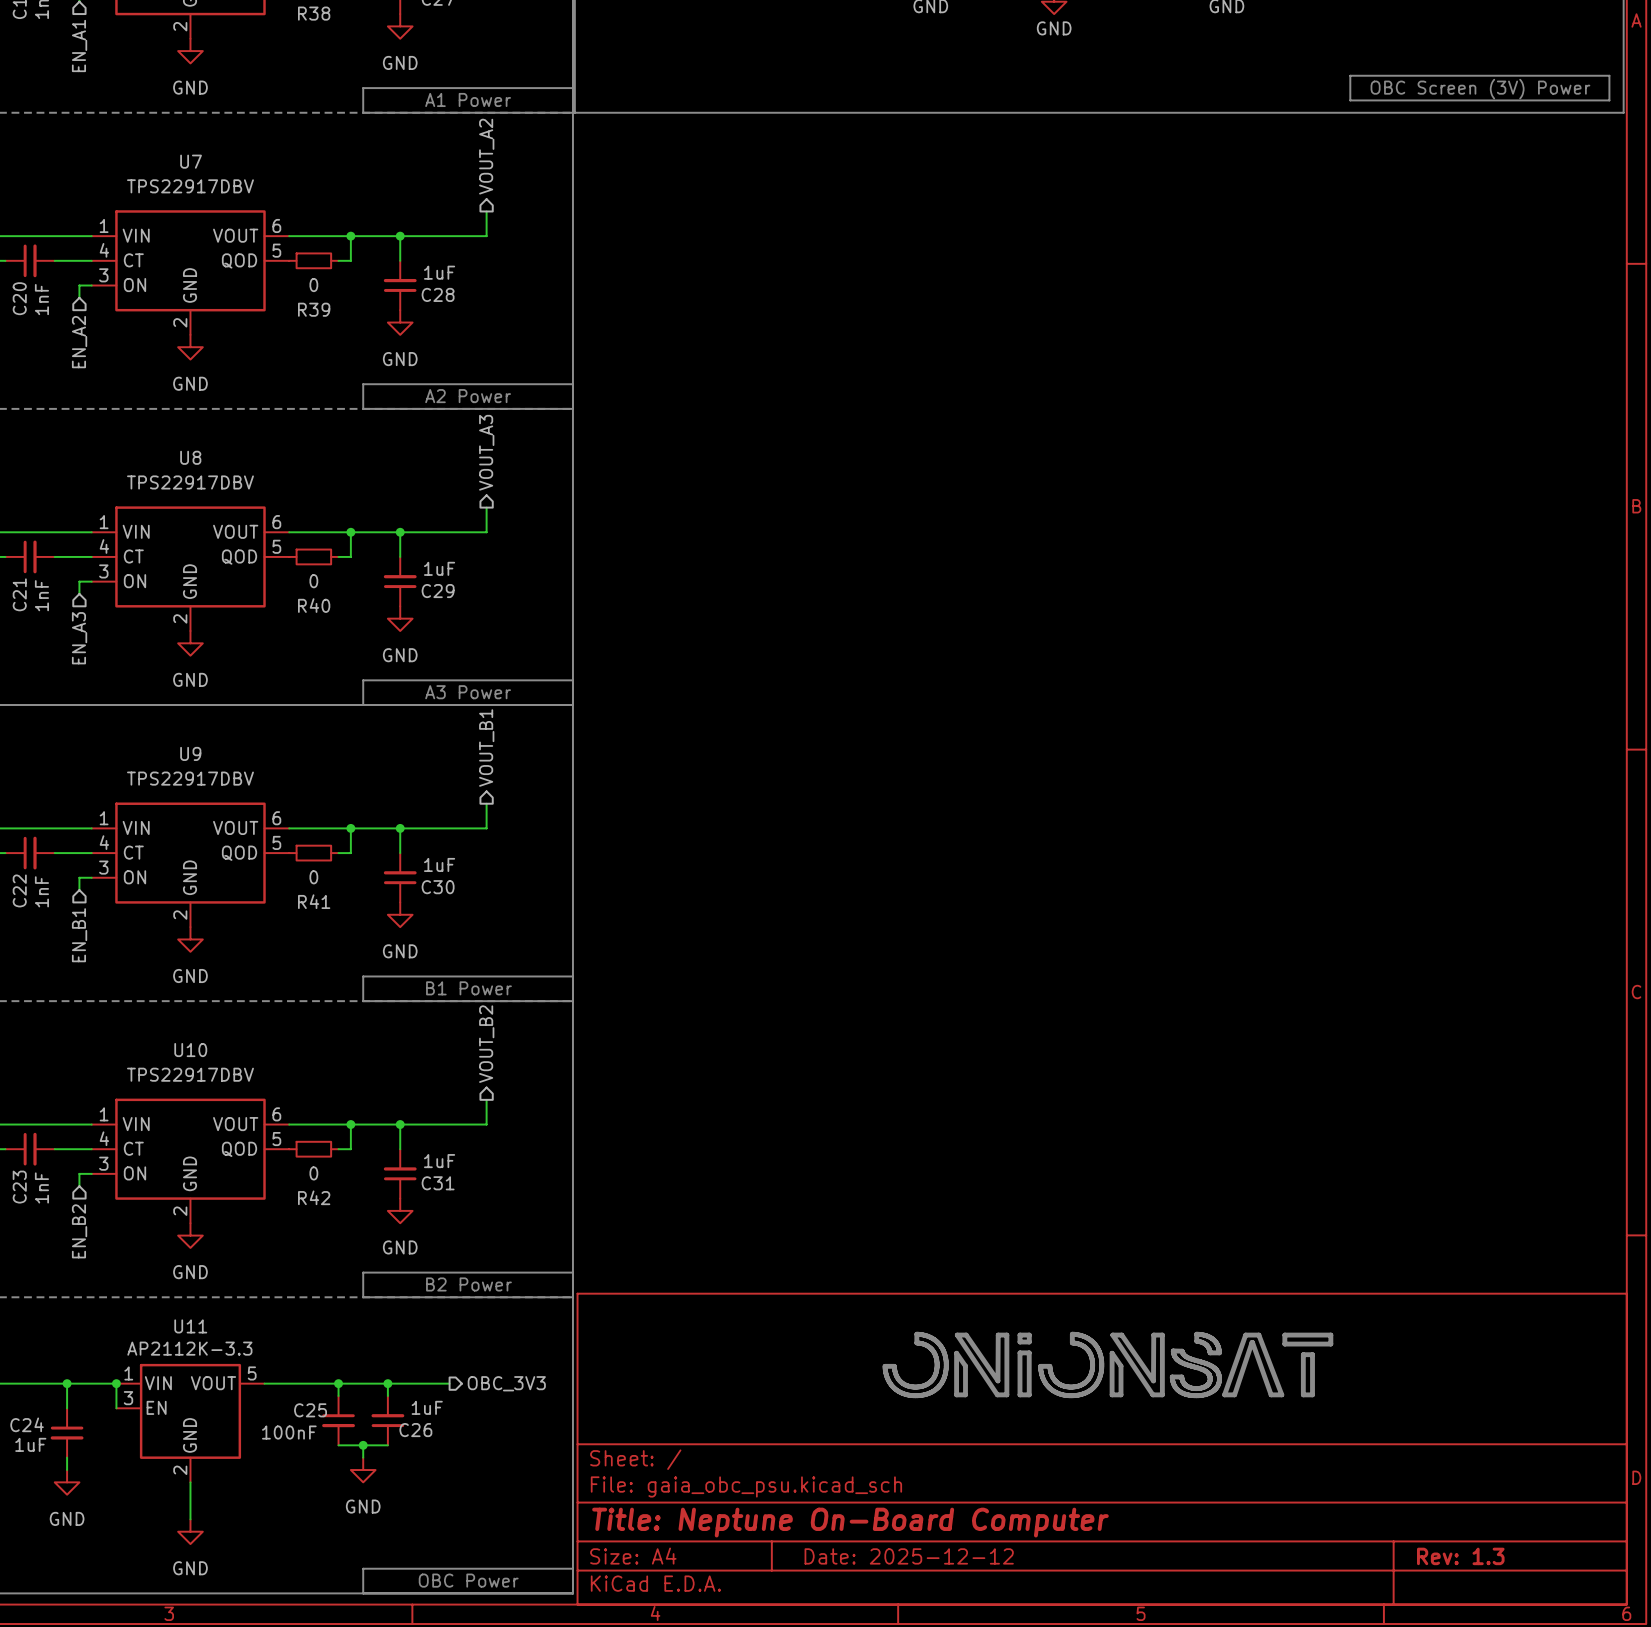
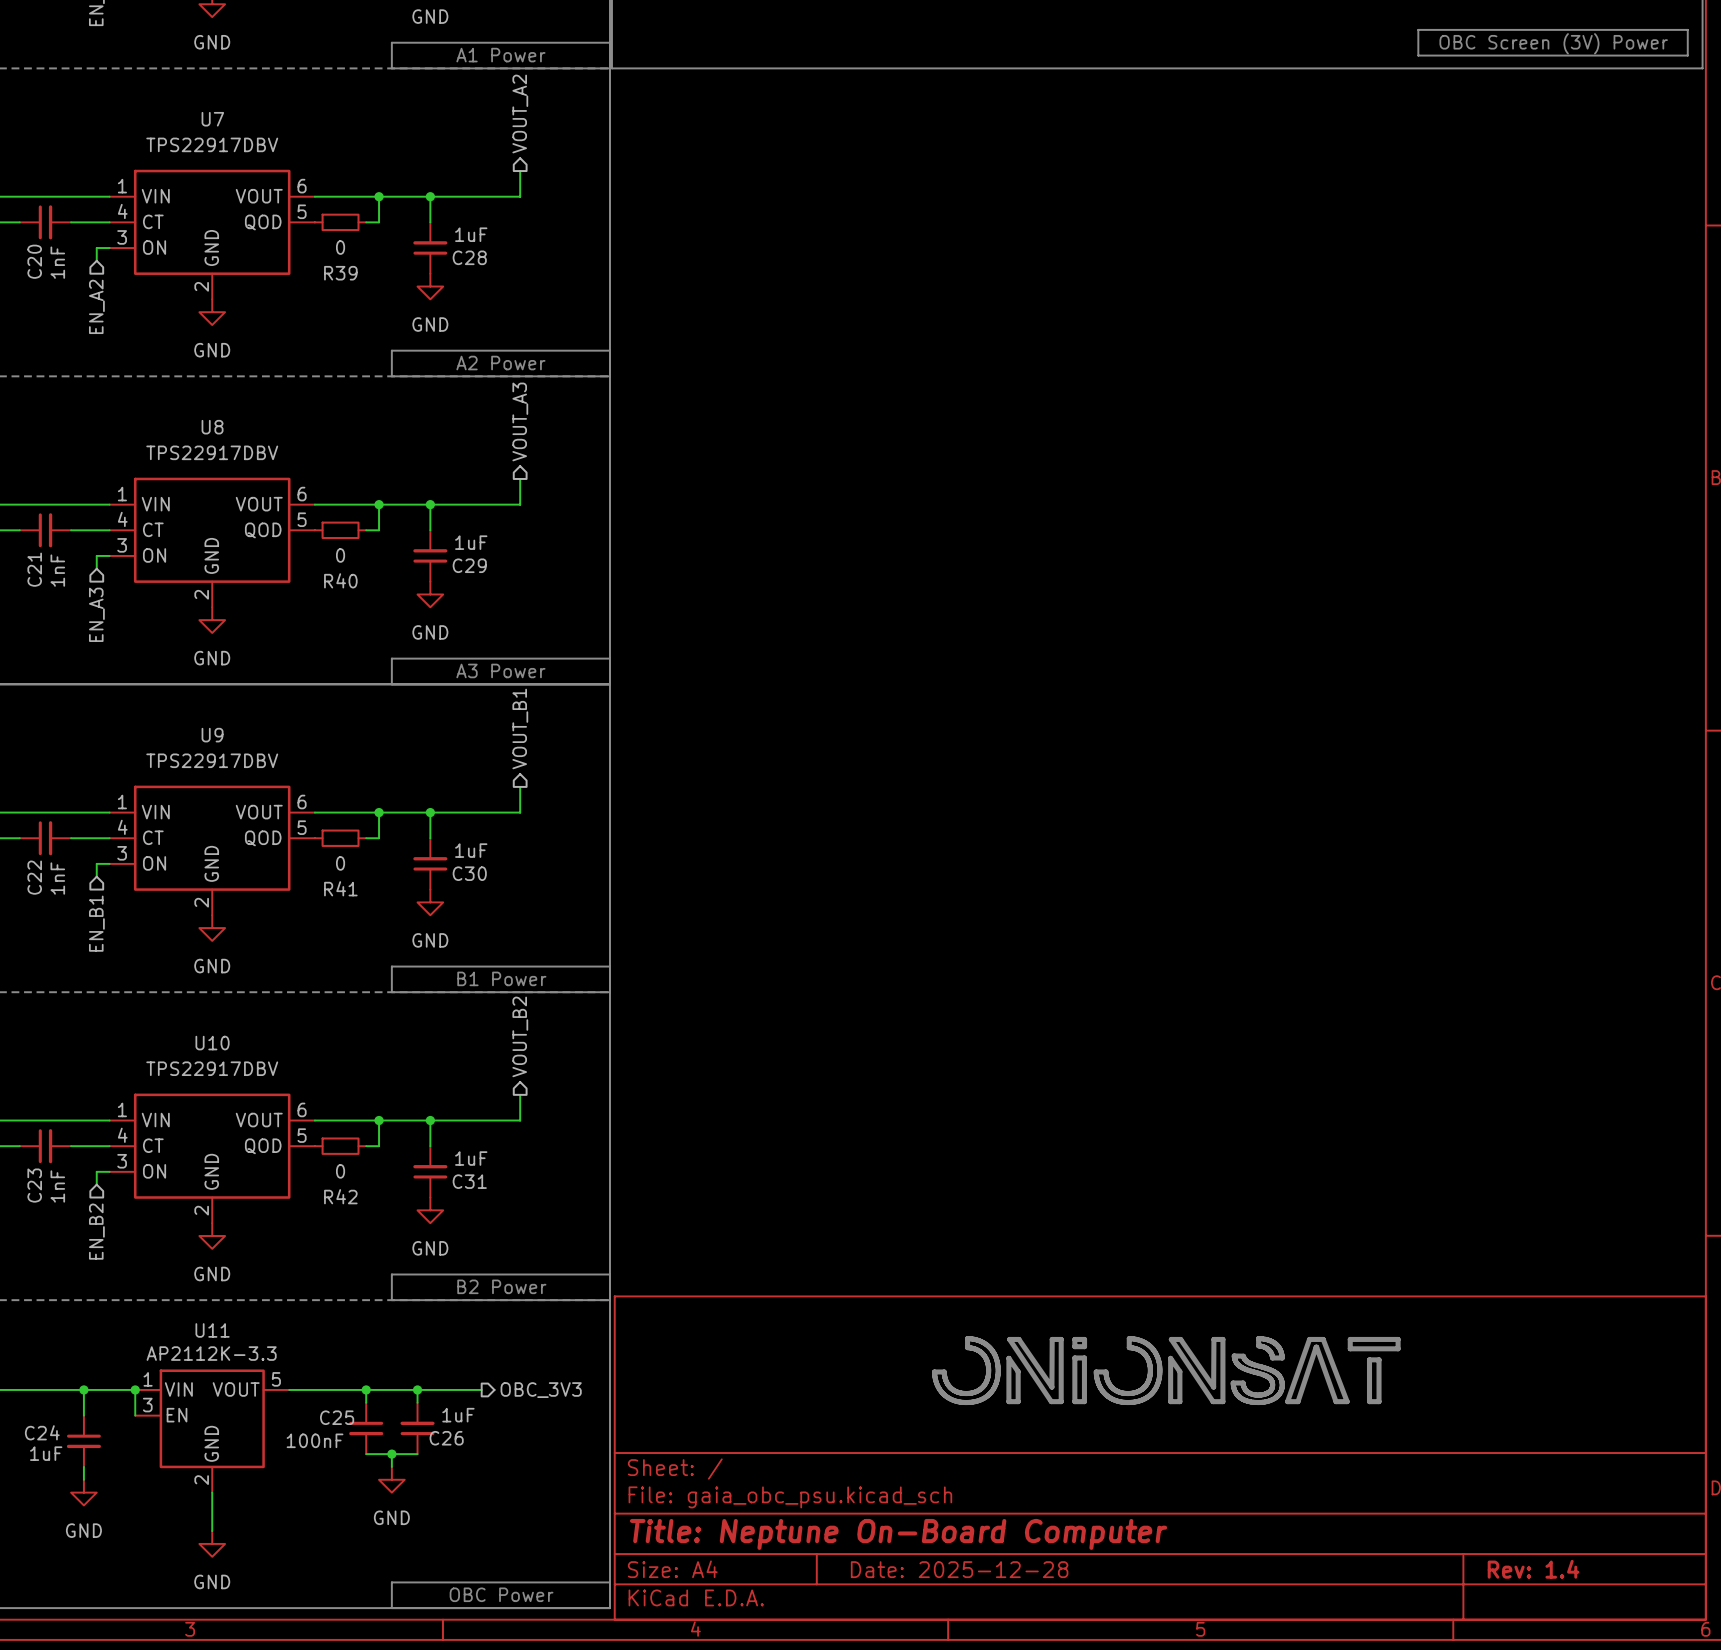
title block: Date: 2025-12-12 (909, 1556) -> Date: 2025-12-28 (959, 1569)
title block: Rev: 1.3 (1460, 1556) -> Rev: 1.4 (1533, 1569)

